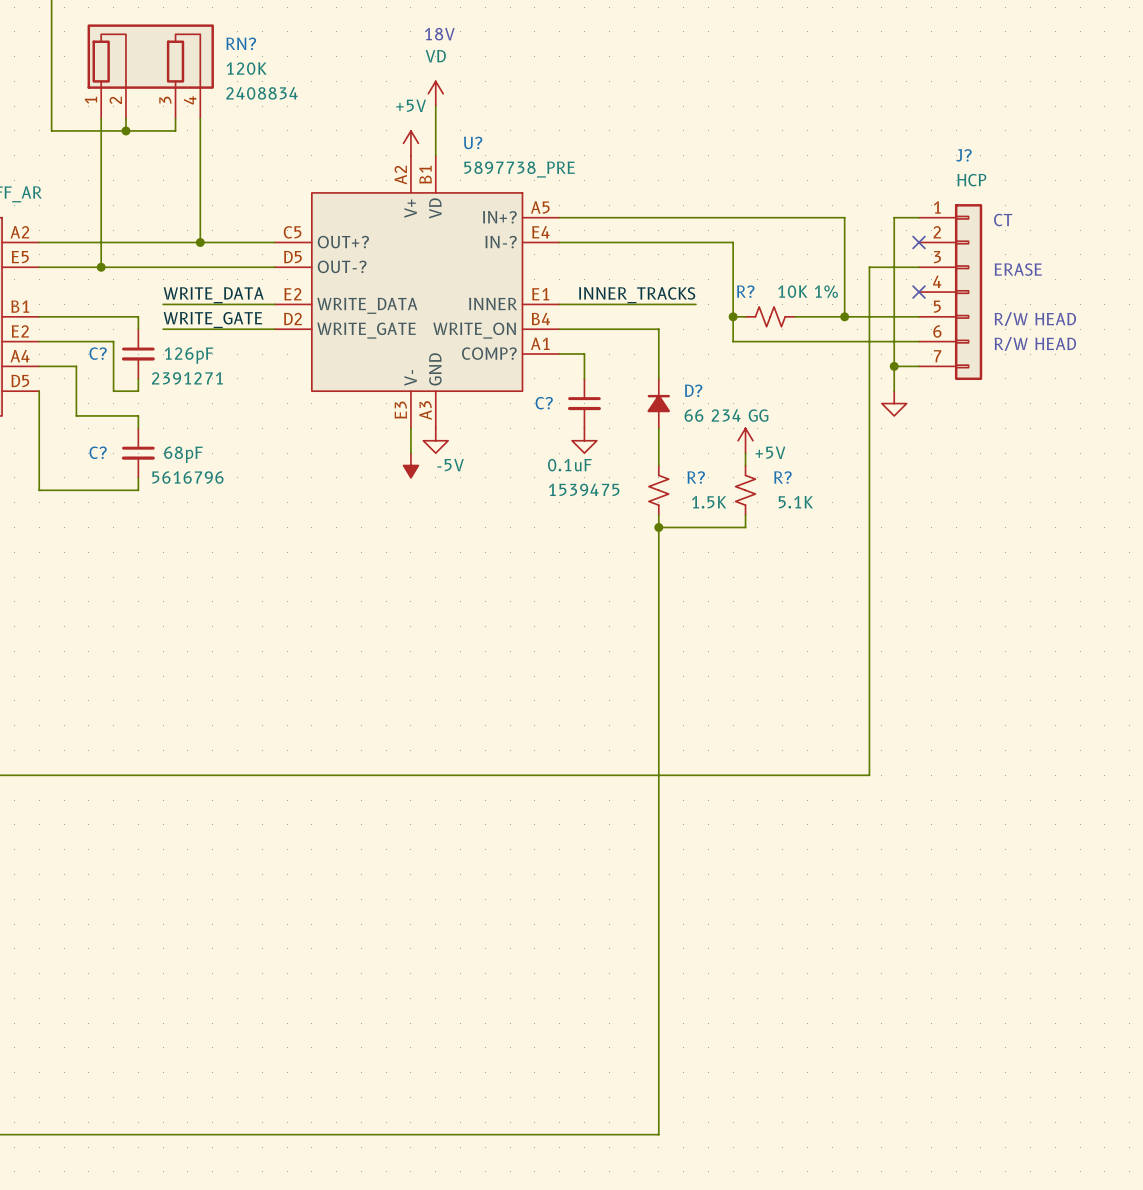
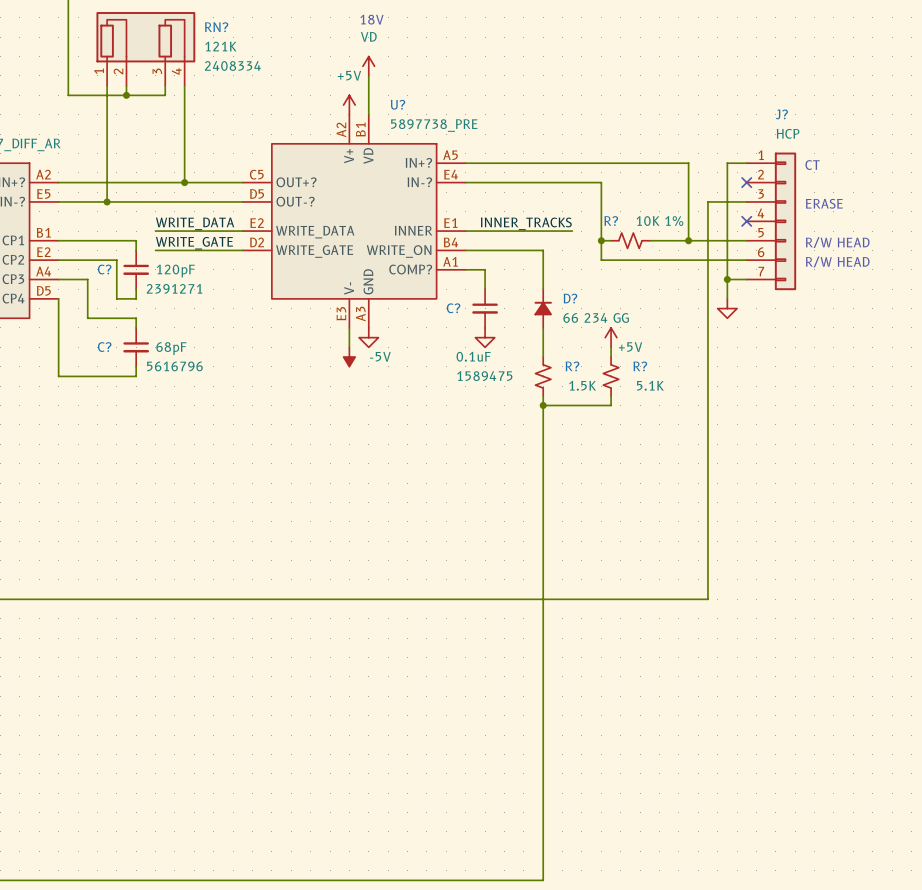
RN? value: 120K (246, 68) -> 121K (220, 46)
RN? text: 2408834 (261, 93) -> 2408334 (232, 65)
C? value: 126pF (188, 355) -> 120pF (175, 271)
C? text: 1539475 (584, 489) -> 1589475 (484, 376)

